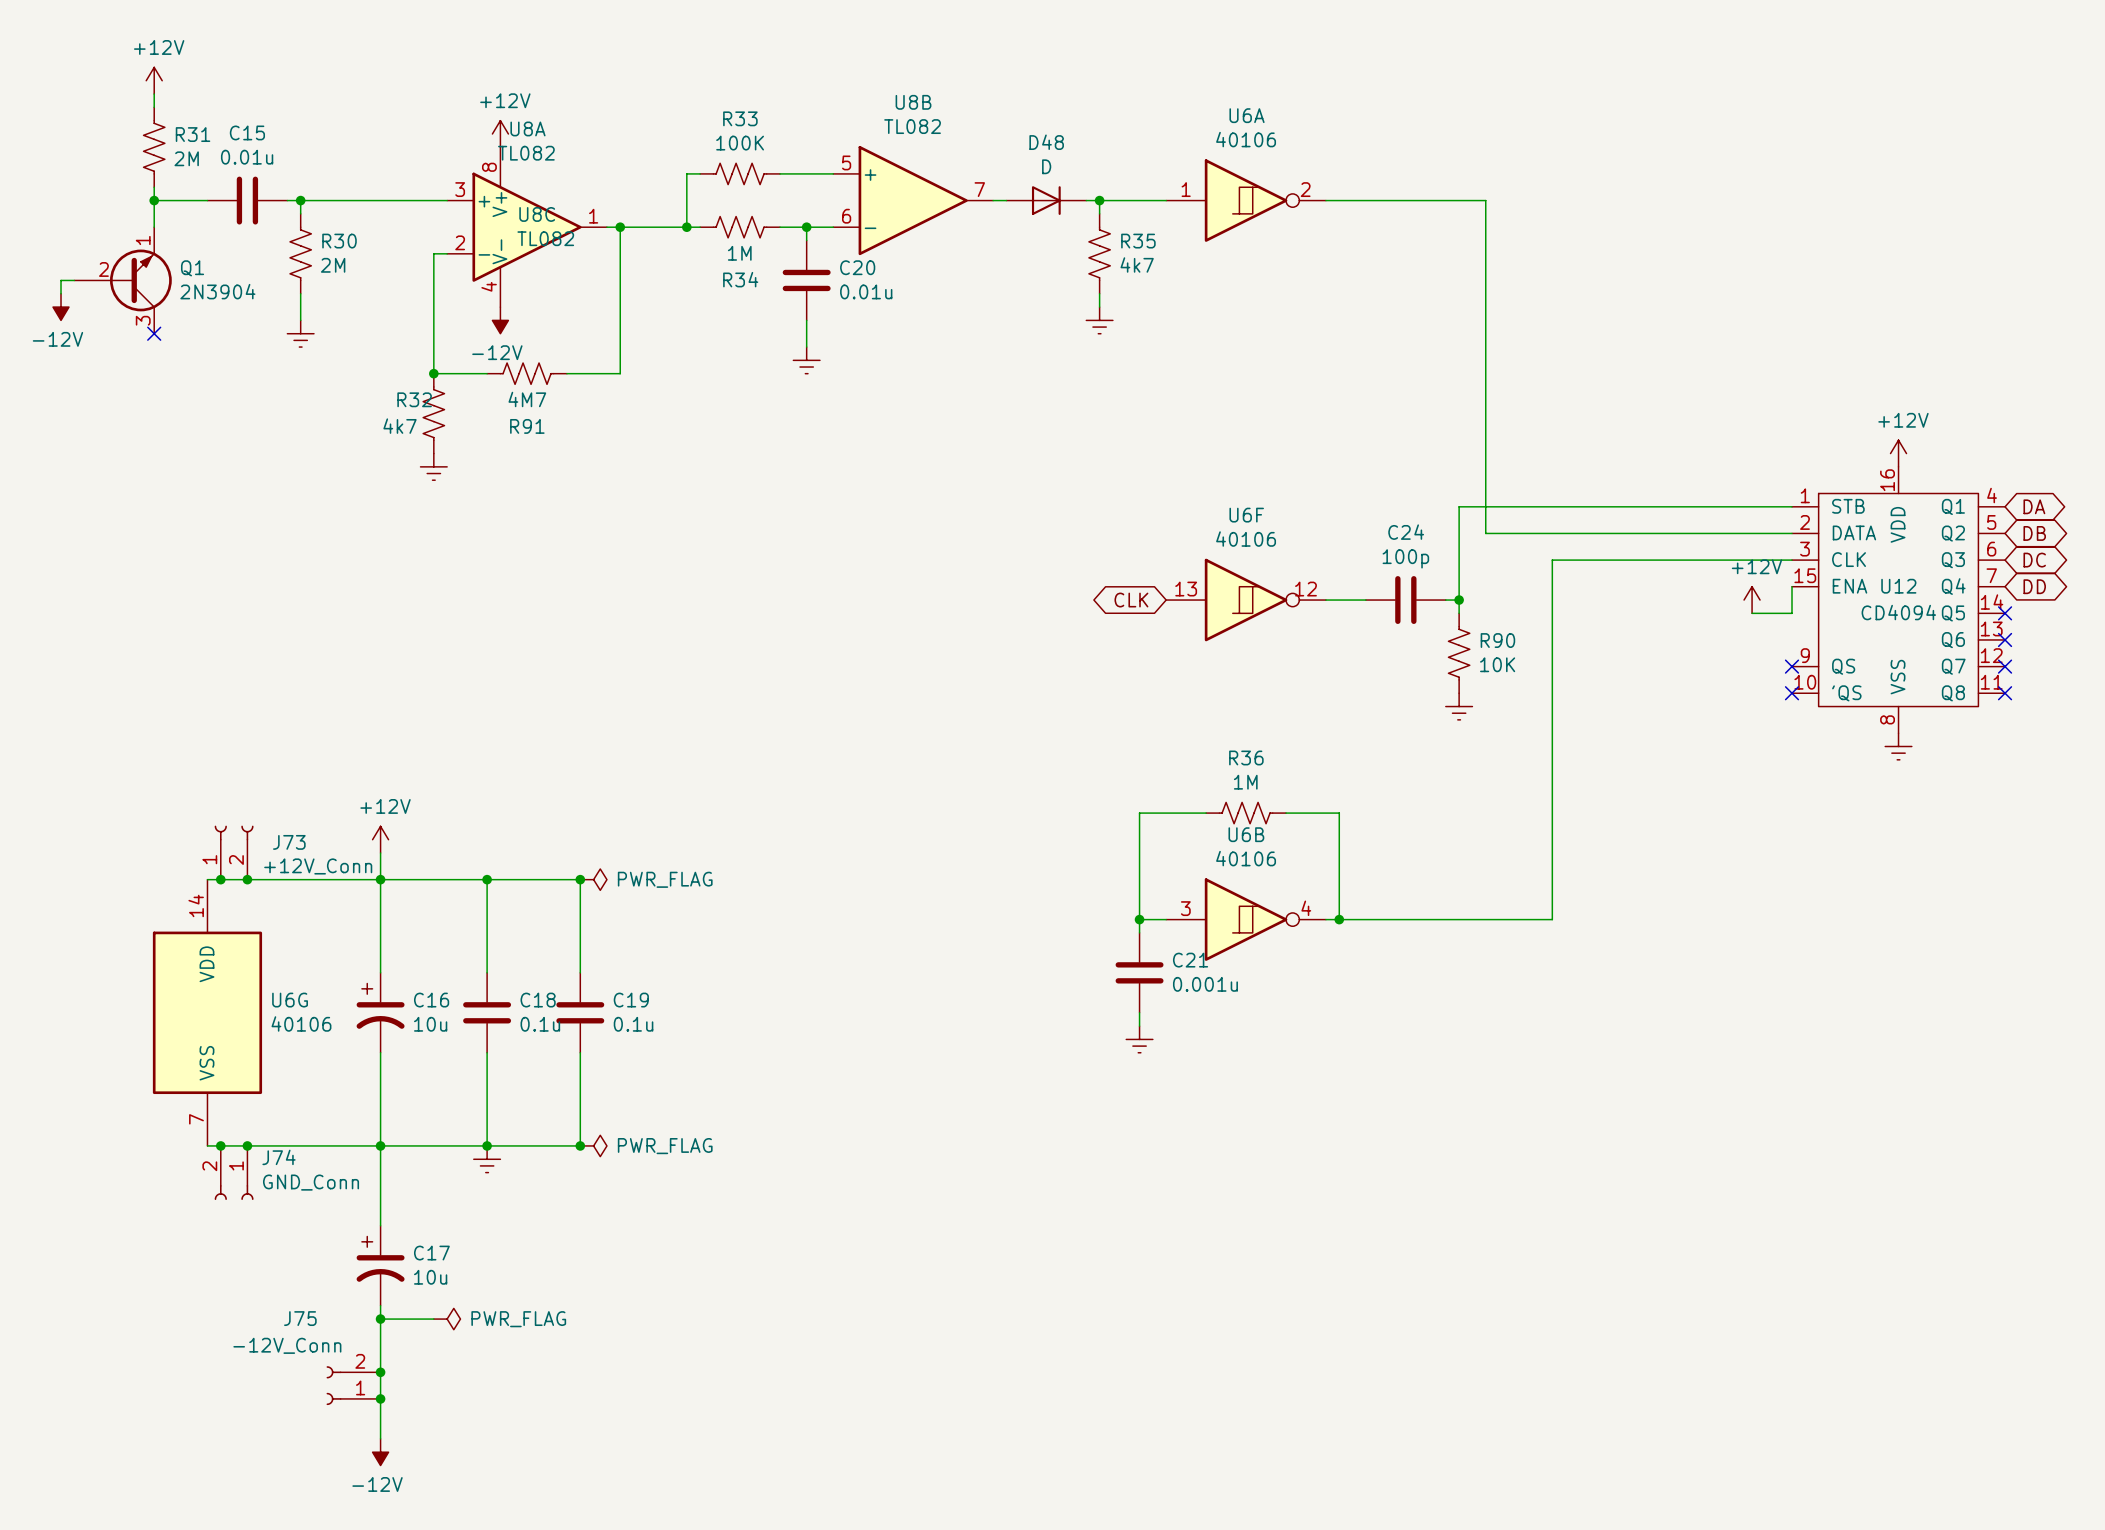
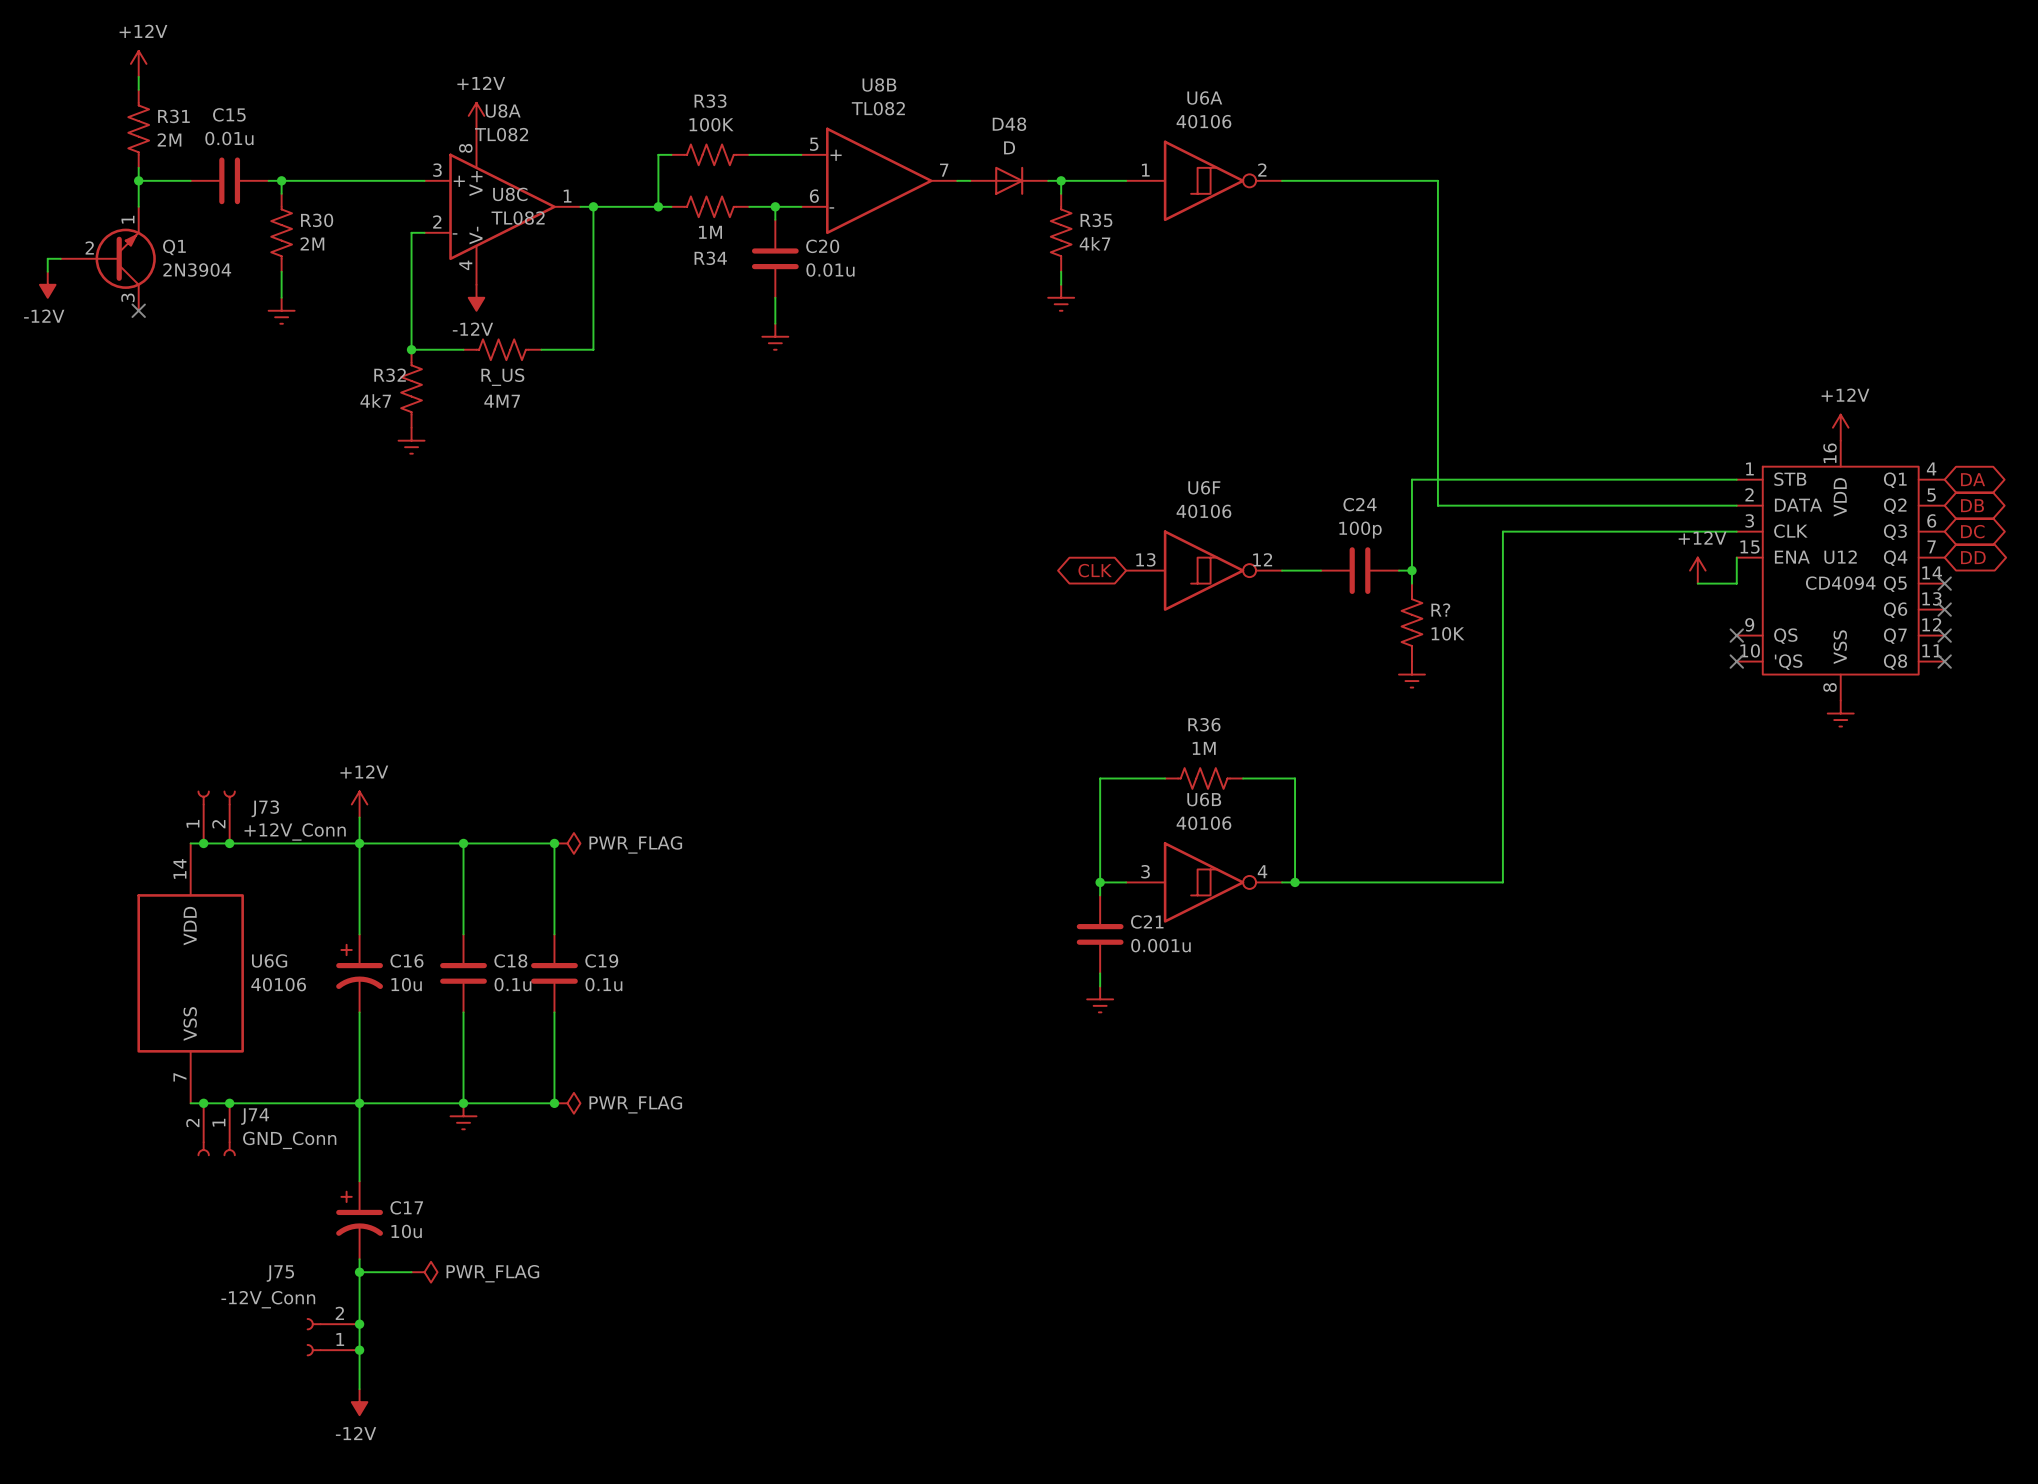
R91 value: 4M7 (527, 399) -> R_US (502, 377)
R91 name: R91 (527, 426) -> 4M7 (502, 401)
R90 name: R90 (1497, 640) -> R? (1440, 610)

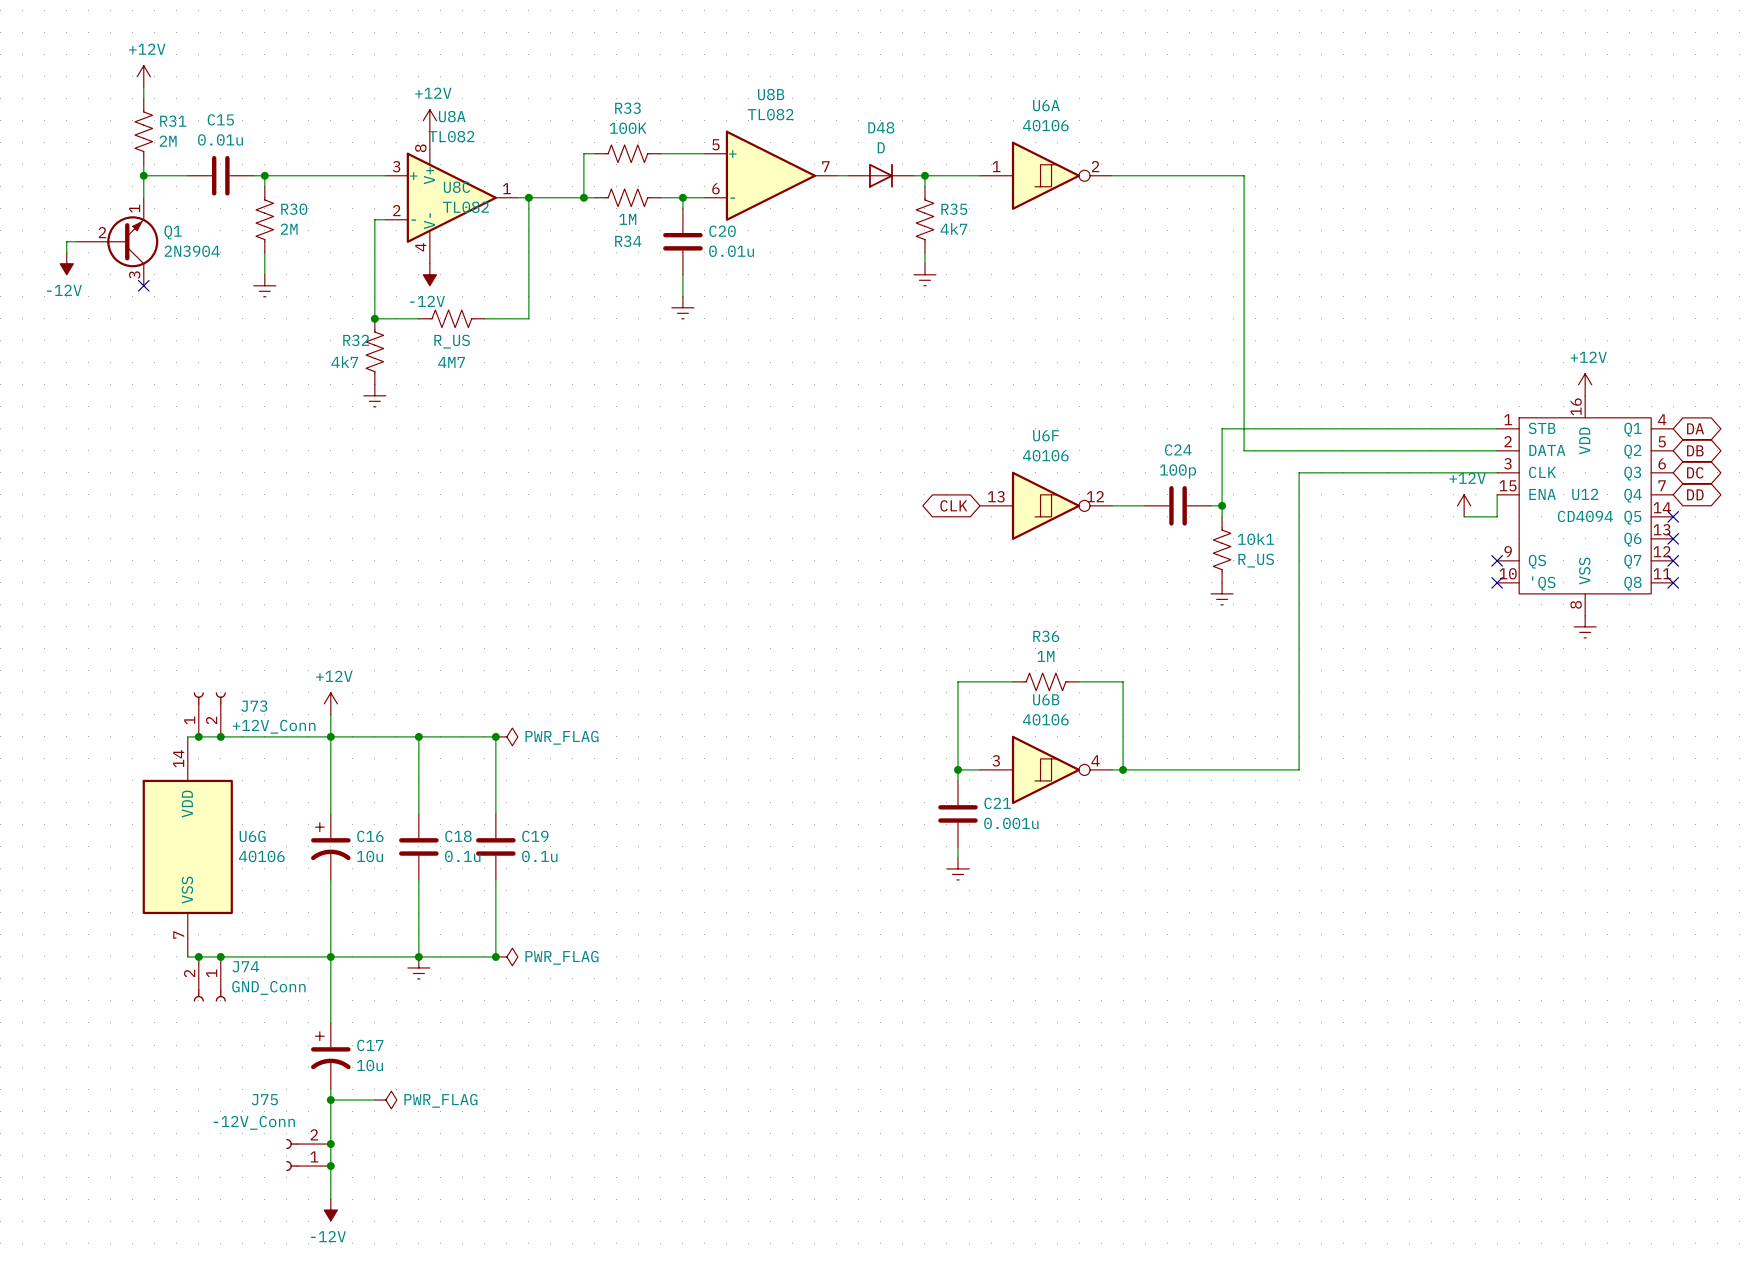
R? name: R? (1440, 610) -> 10k1 (1256, 539)
R? value: 10K (1447, 633) -> R_US (1256, 560)

